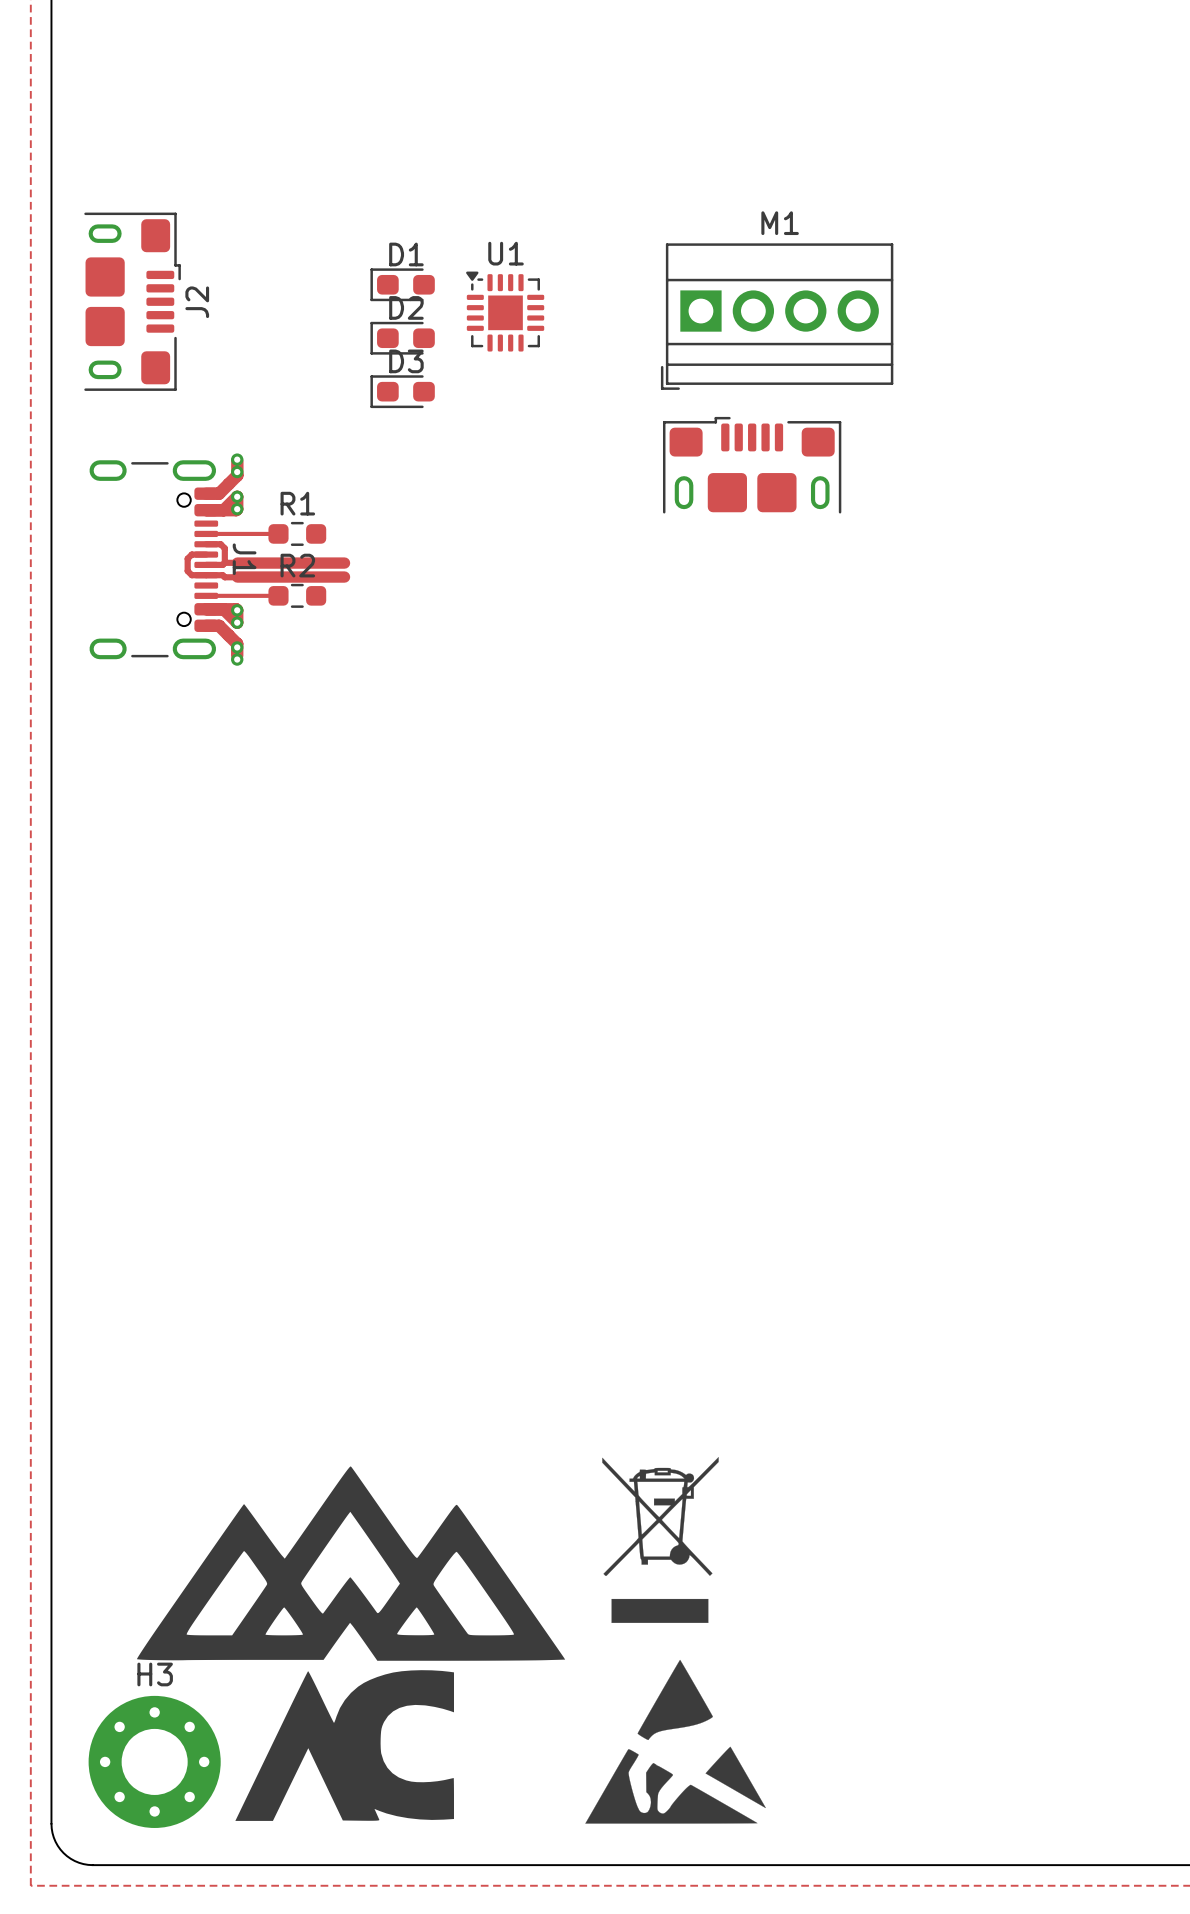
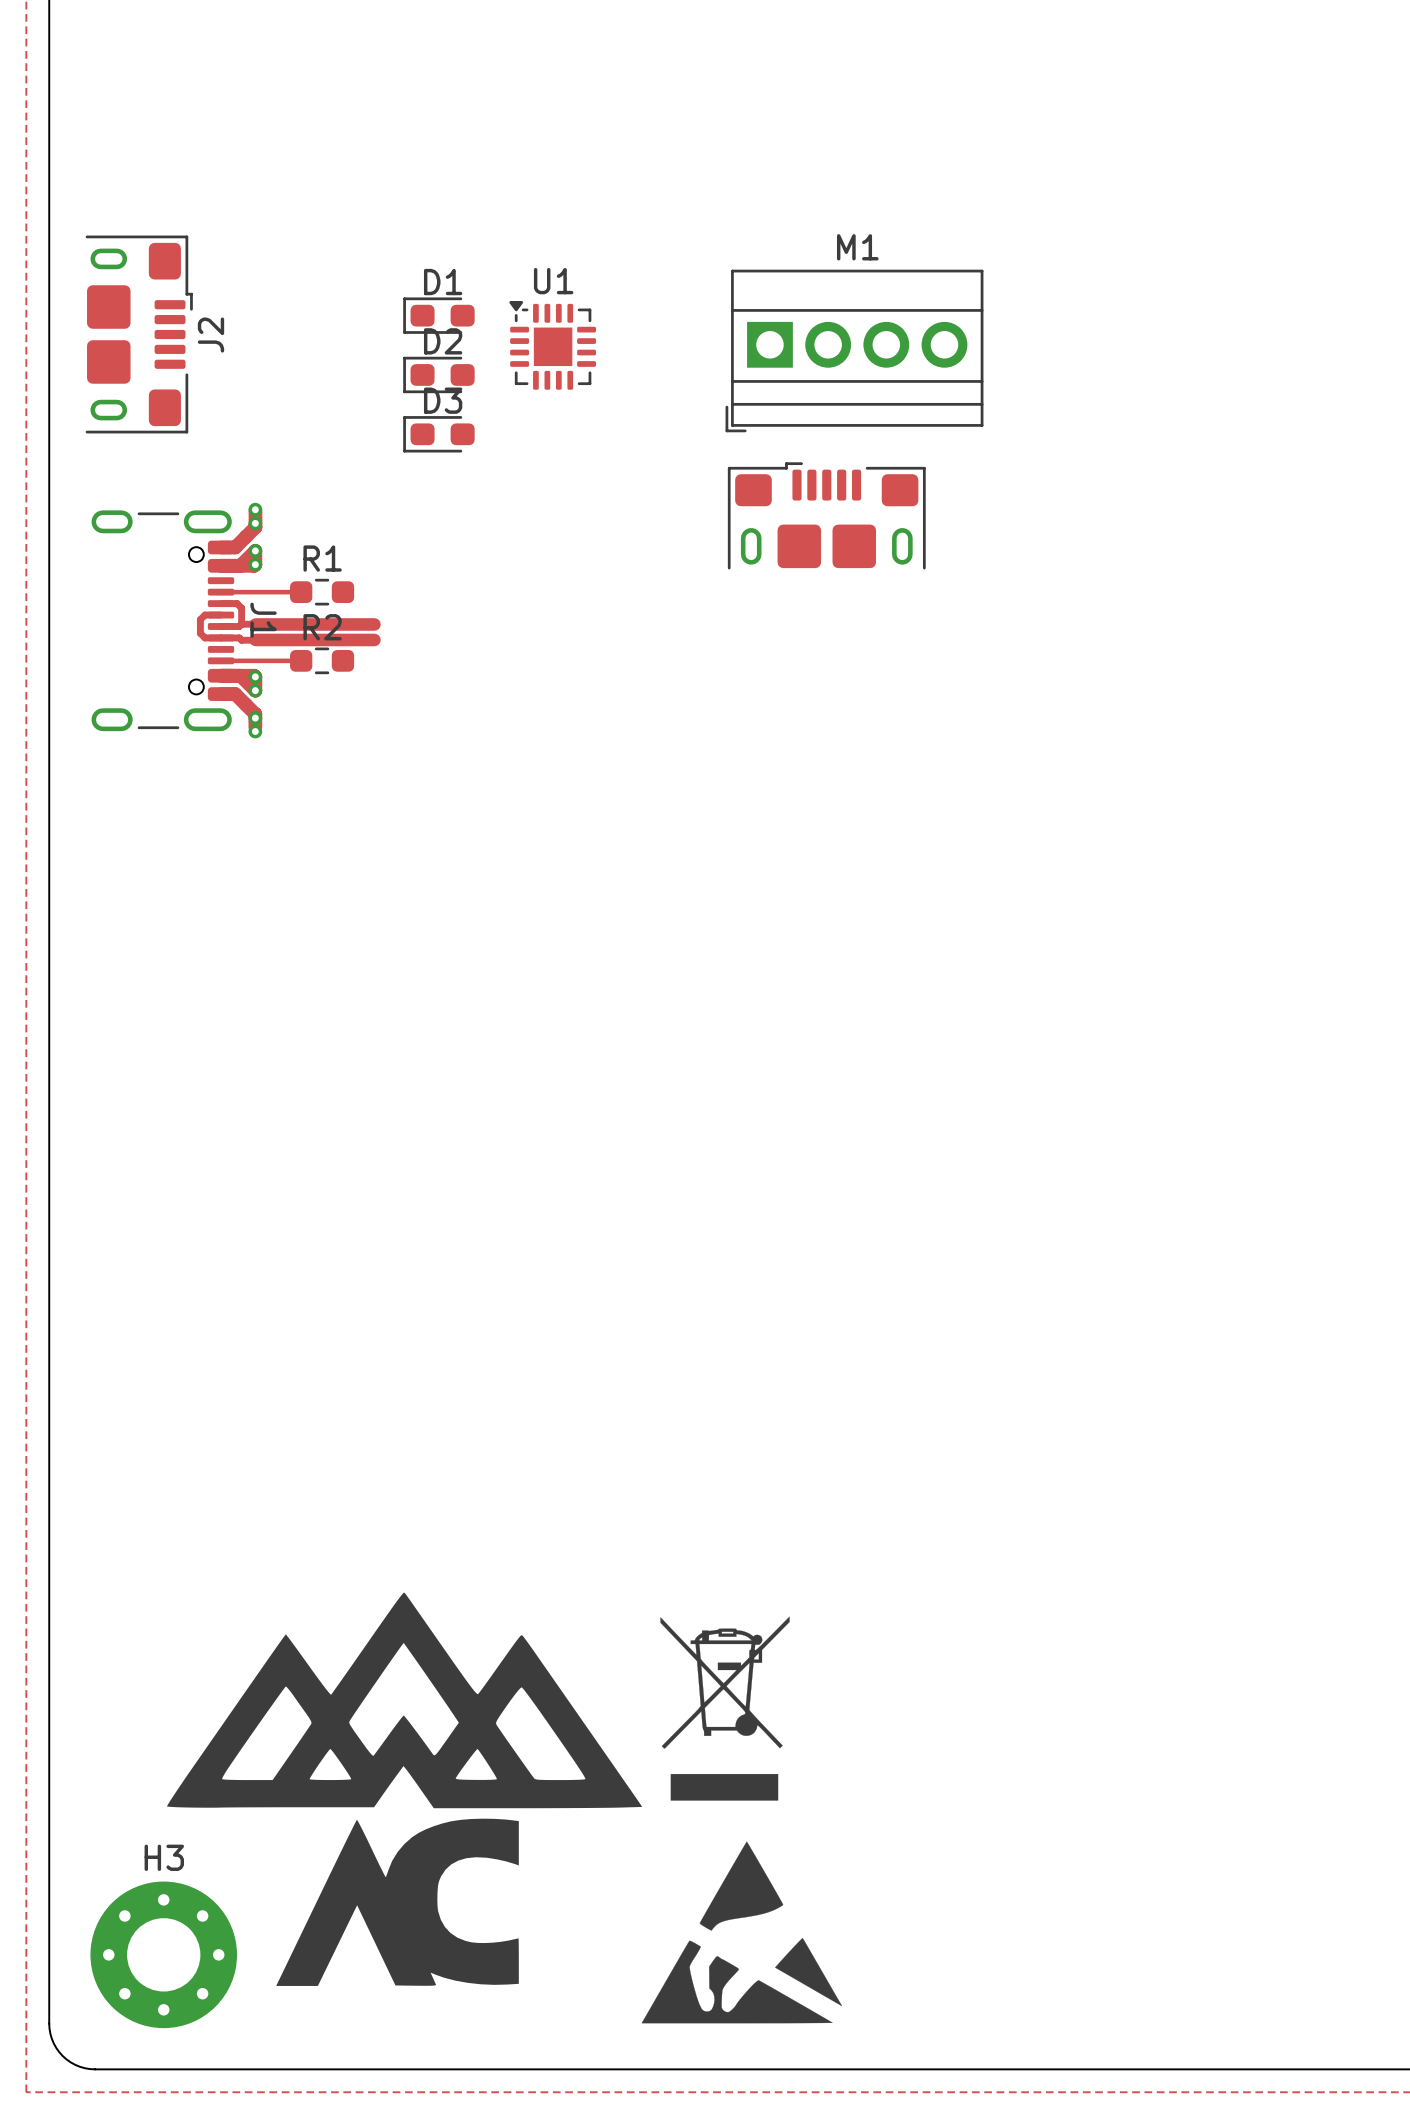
drawing position: (351, 1643) -> (404, 1789)

